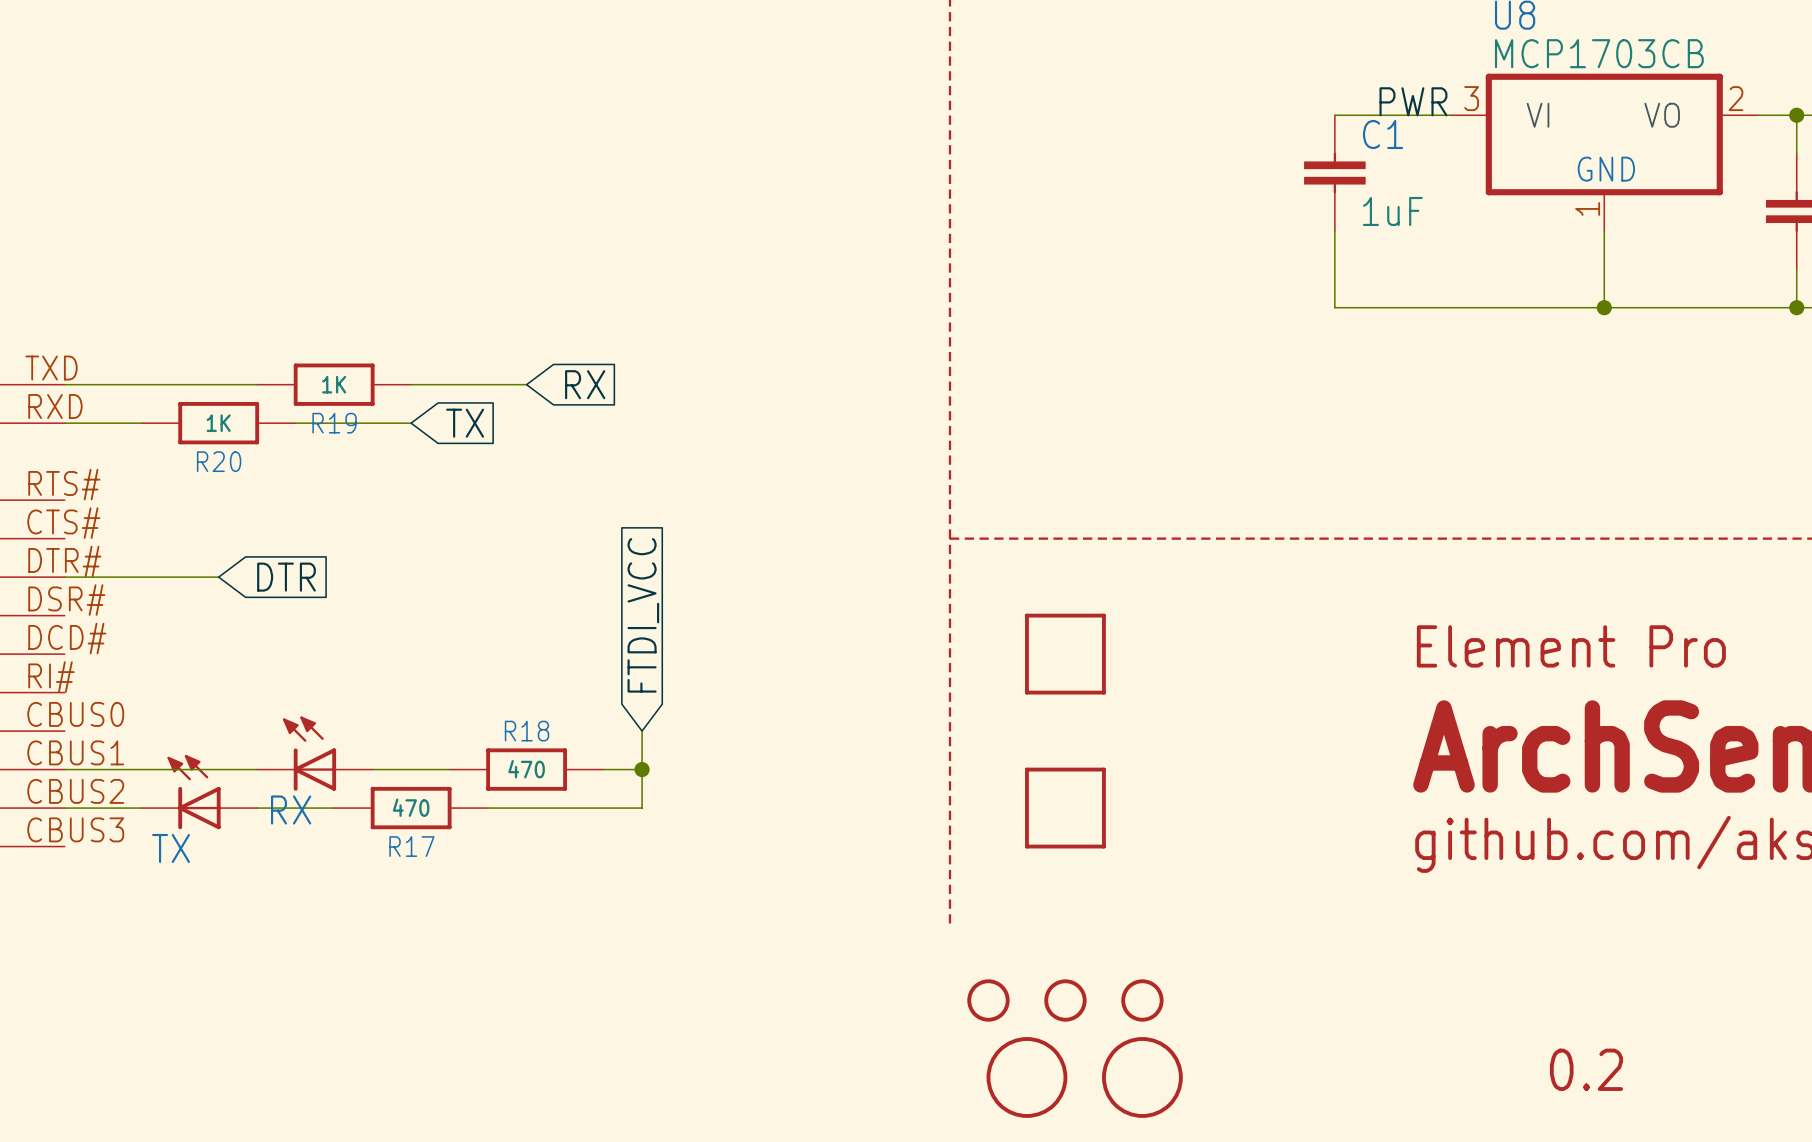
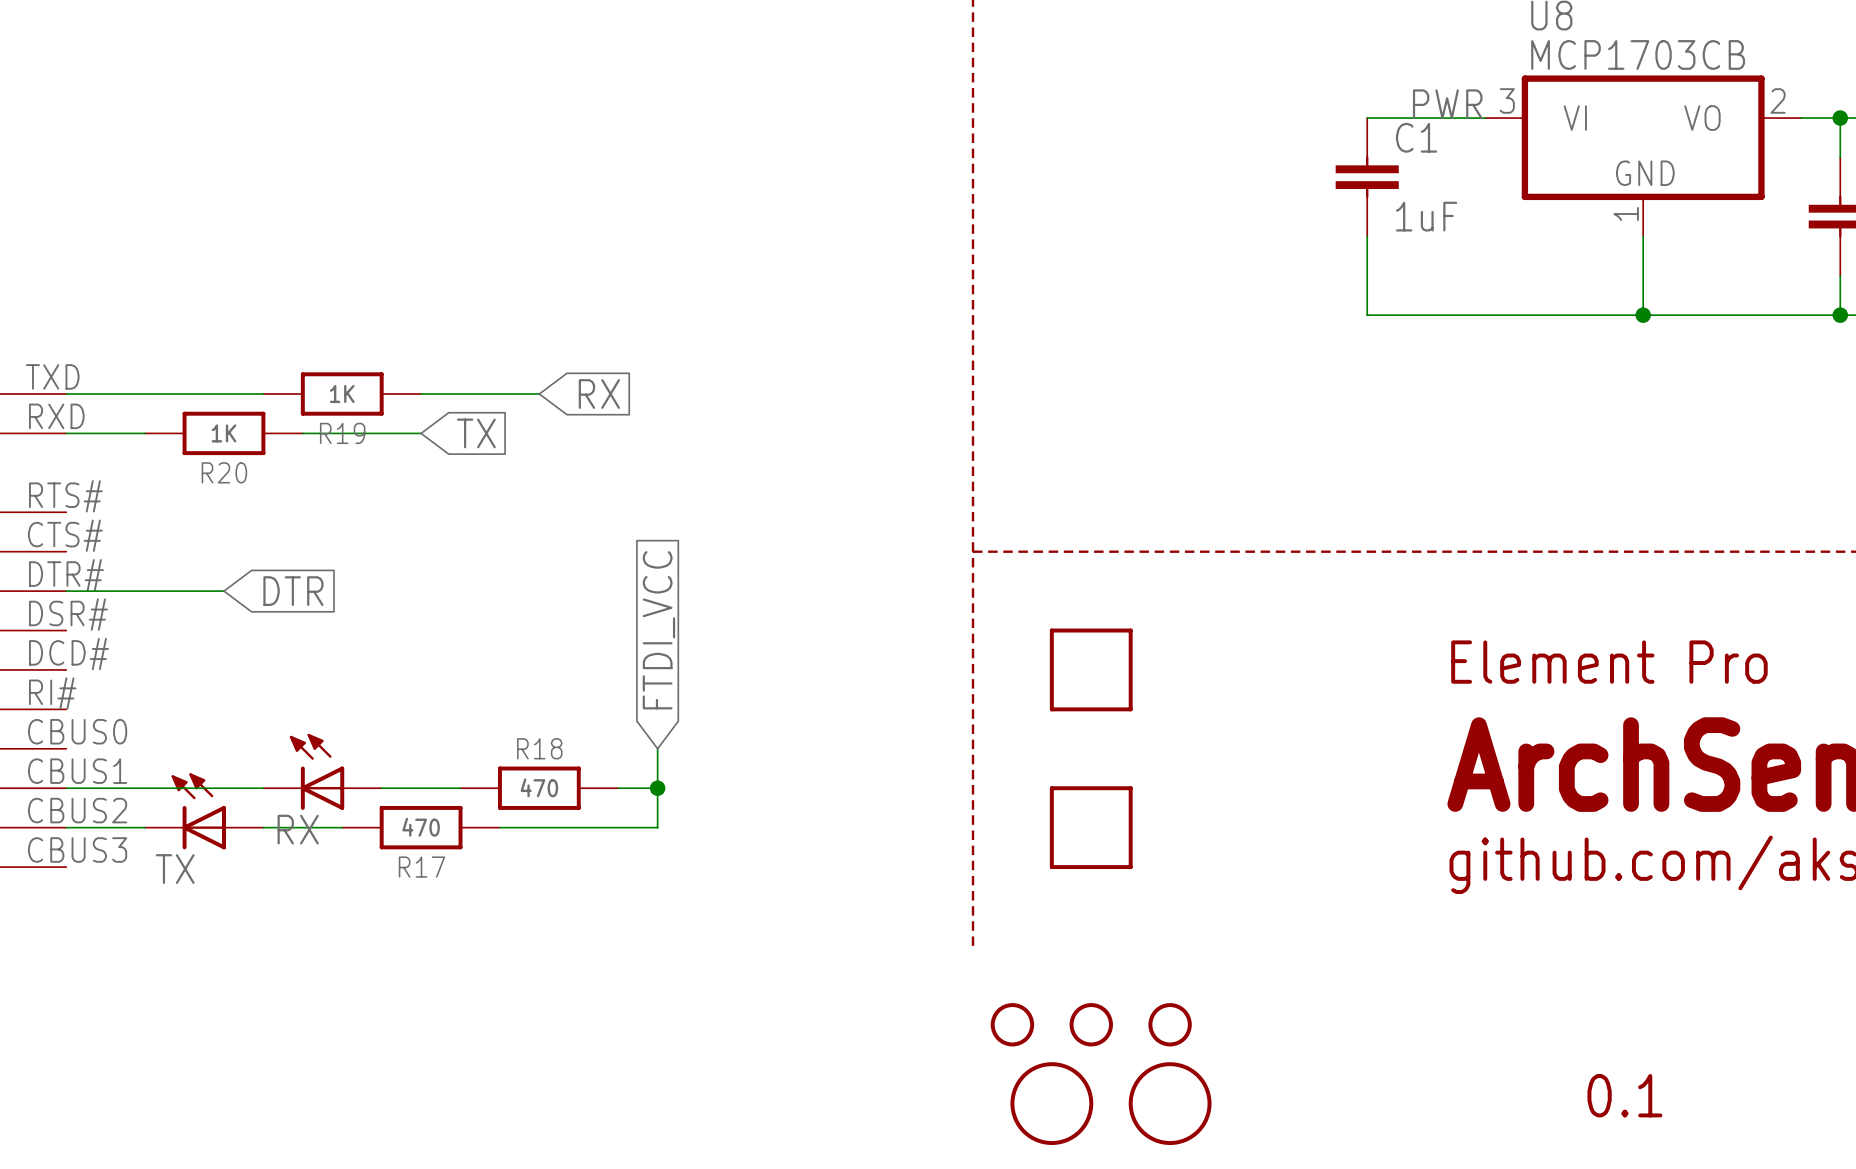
text: 0.2 (1586, 1069) -> 0.1 (1624, 1095)

